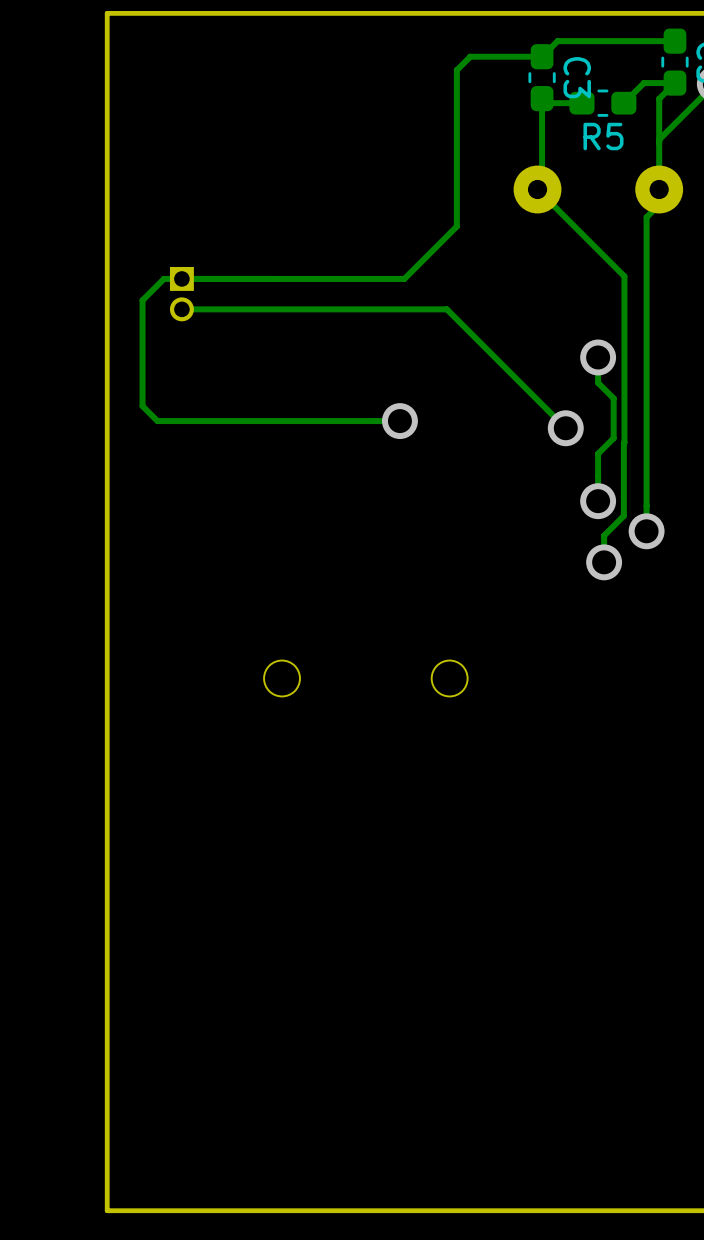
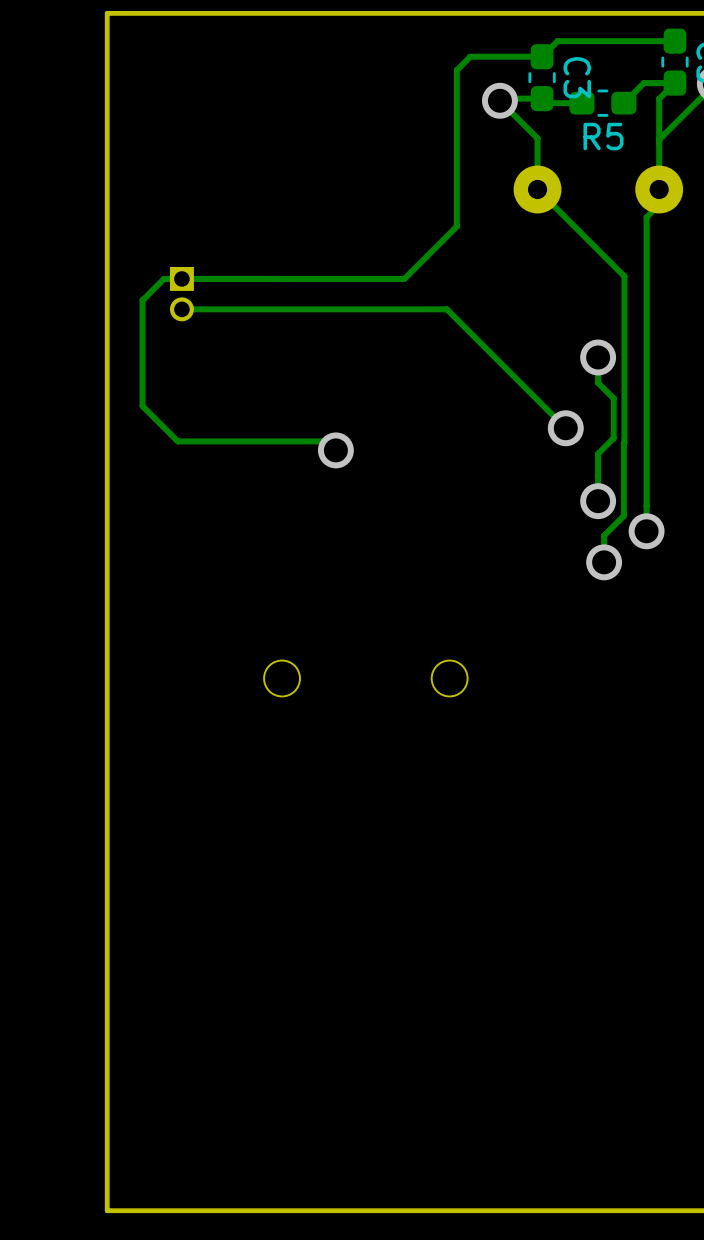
track: (542, 98) (542, 184) (537, 189) -> (542, 98) (502, 98) (499, 100) (537, 138) (537, 189)
via: none -> (499, 100)
track: (399, 421) (157, 421) -> (335, 450) (326, 441) (177, 441) (157, 421)
via position: (399, 421) -> (335, 450)

